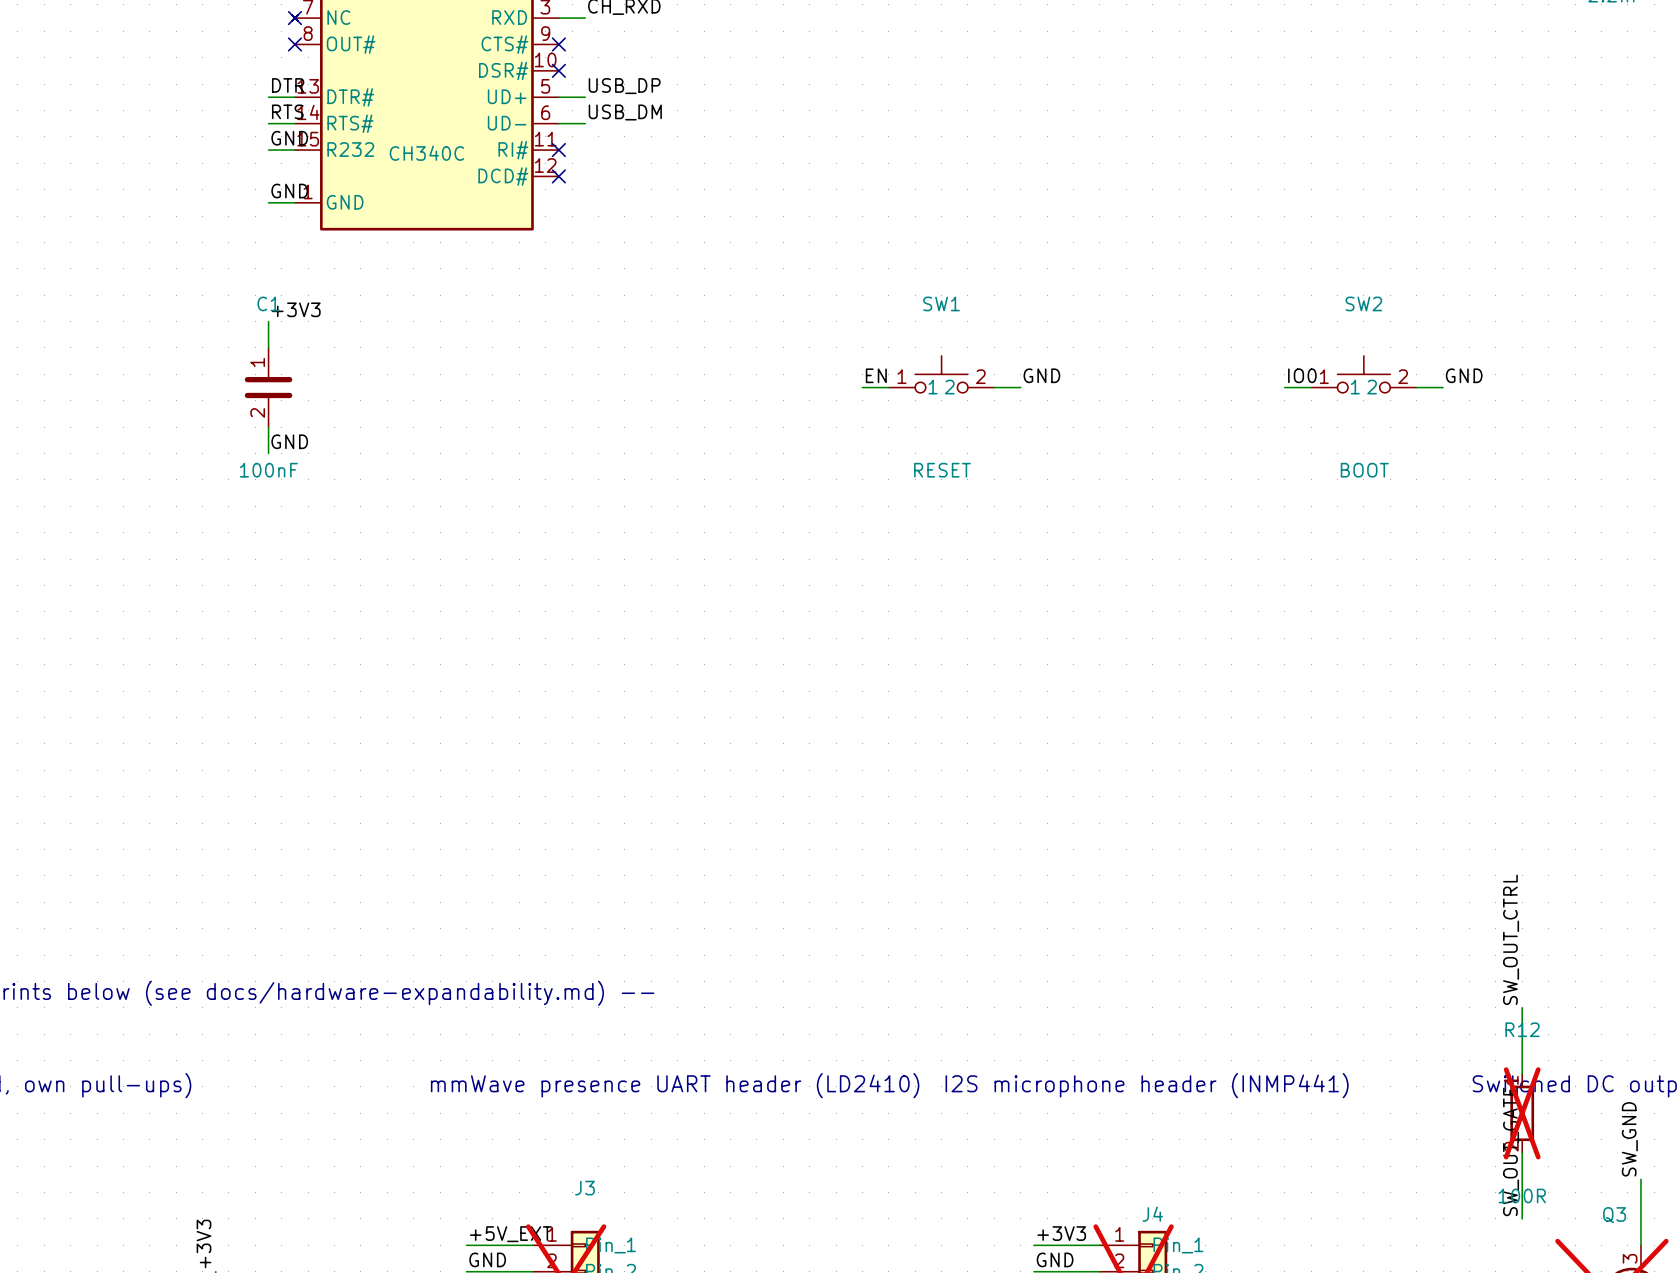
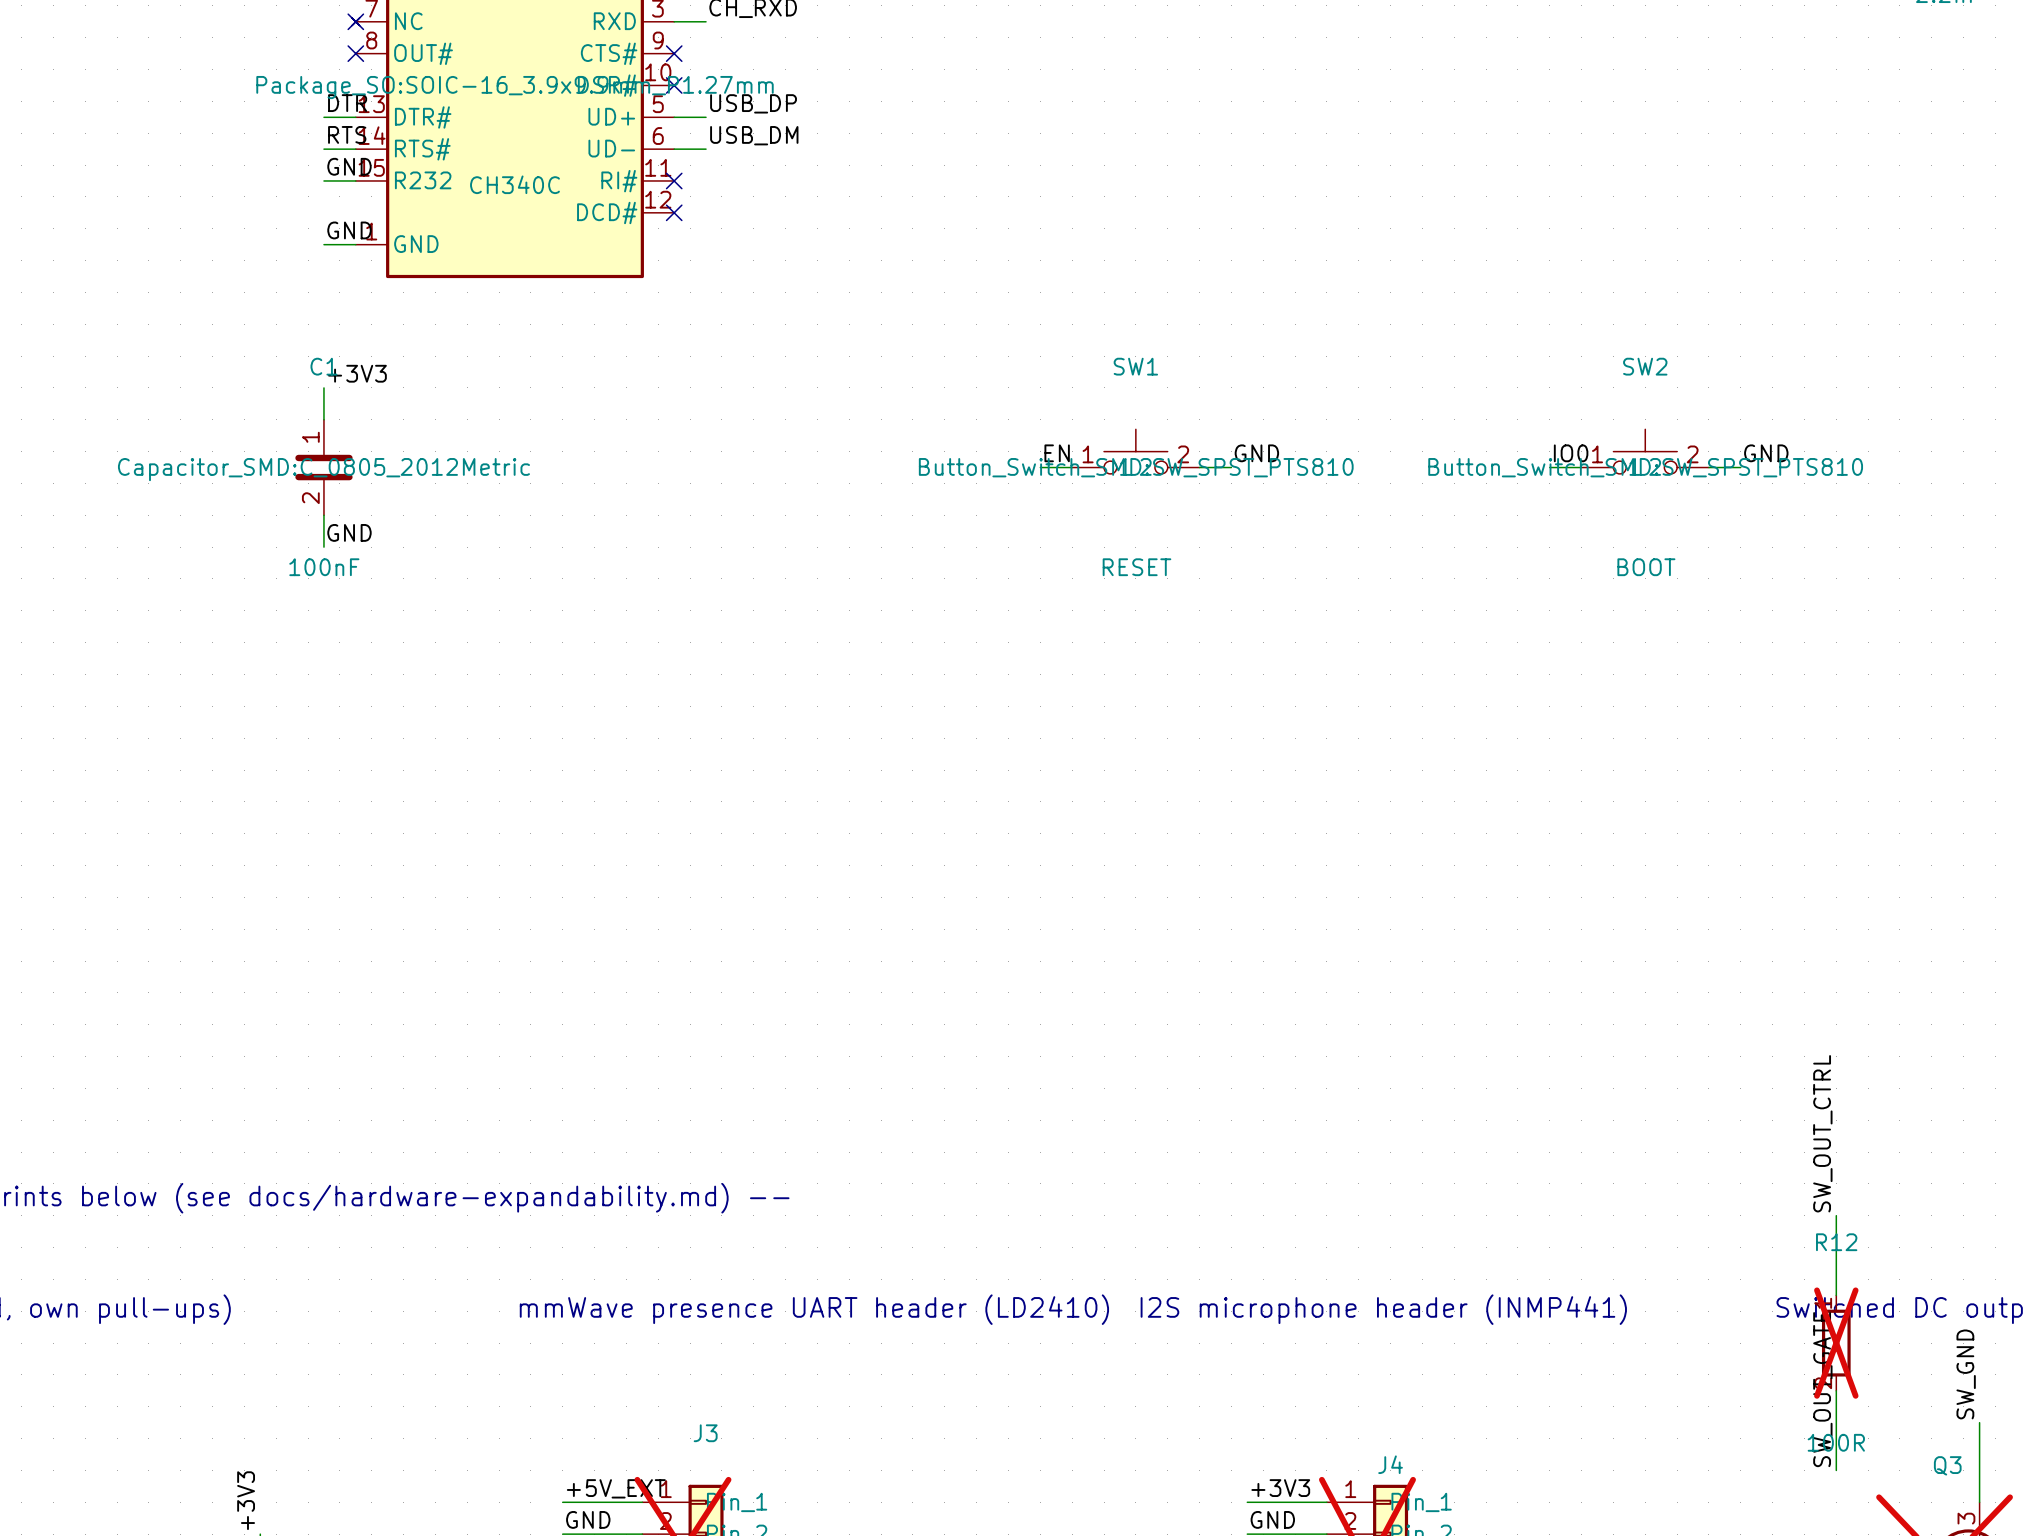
part text: none -> Package_SO:SOIC-16_3.9x9.9mm_P1.27mm (515, 87)
SW1 text: none -> Button_Switch_SMD:SW_SPST_PTS810 (1136, 467)
SW2 text: none -> Button_Switch_SMD:SW_SPST_PTS810 (1645, 467)
C1 text: none -> Capacitor_SMD:C_0805_2012Metric (323, 469)

